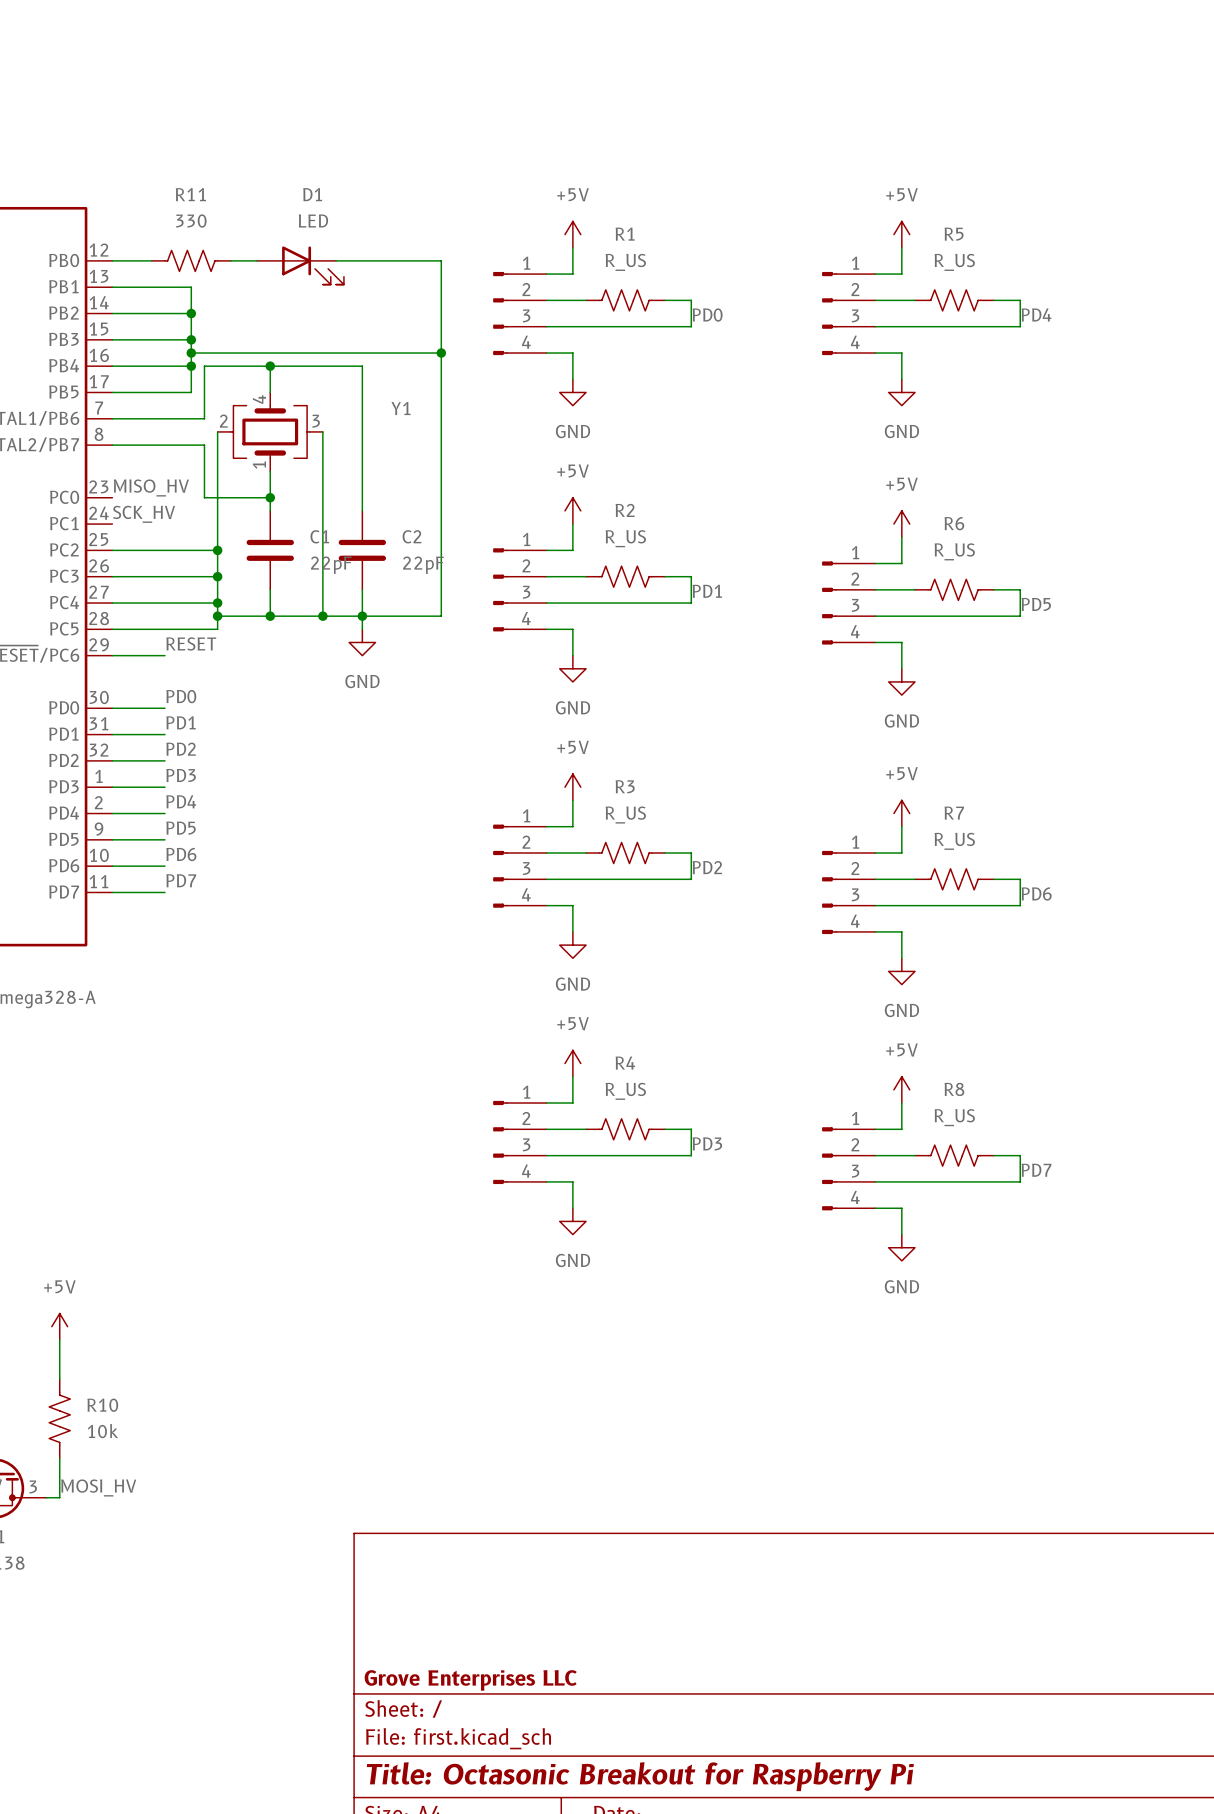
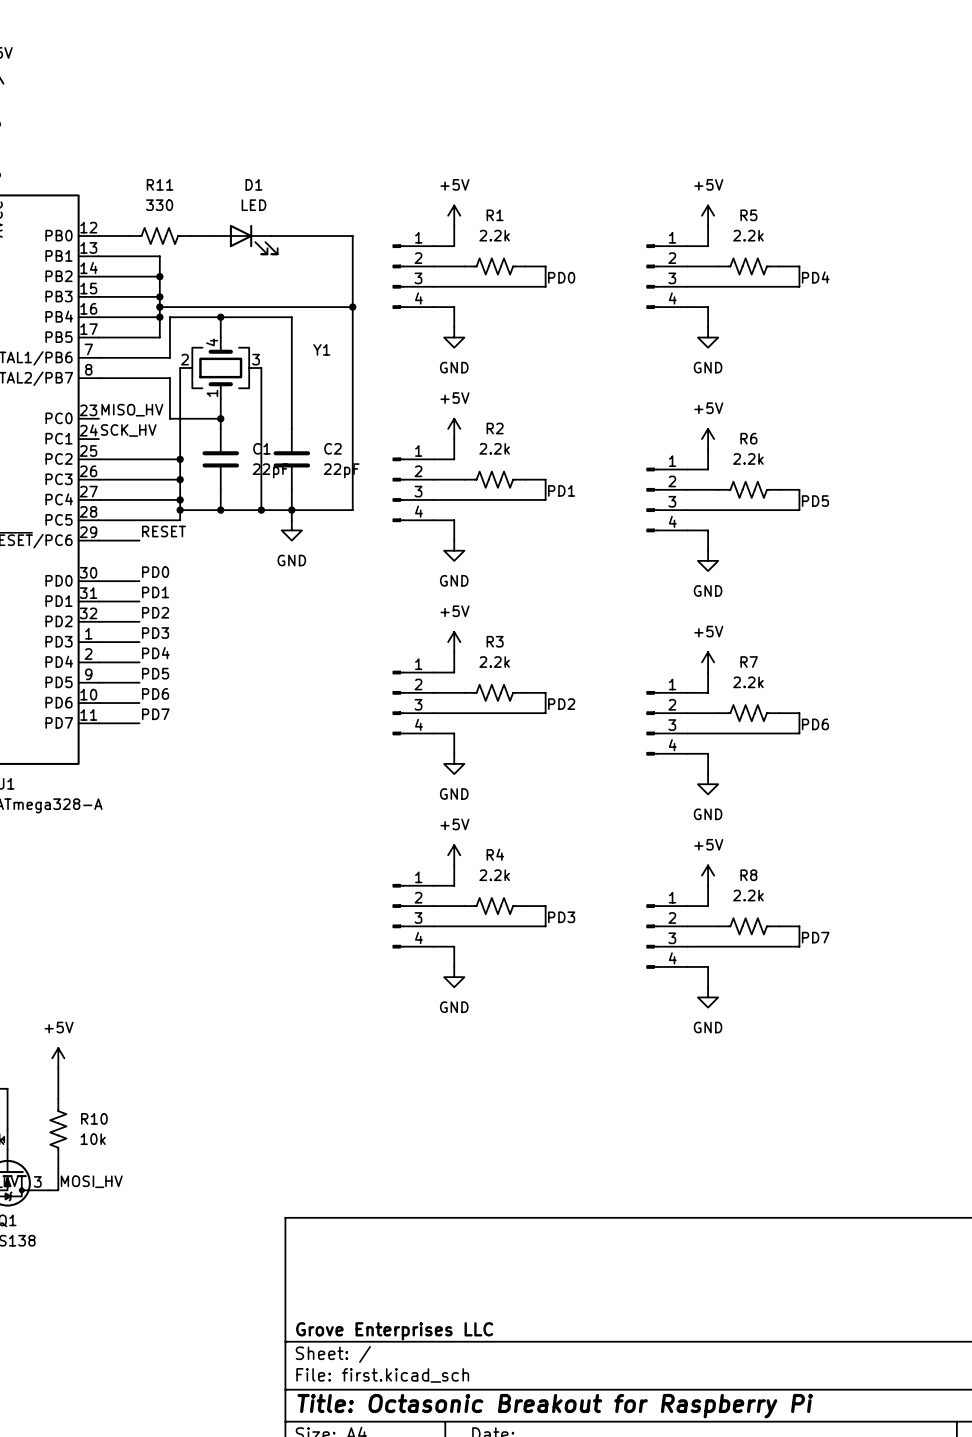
R1 value: R_US (625, 262) -> 2.2k (494, 235)
R5 value: R_US (954, 262) -> 2.2k (748, 235)
R2 value: R_US (625, 538) -> 2.2k (494, 448)
R6 value: R_US (954, 551) -> 2.2k (748, 458)
R3 value: R_US (625, 815) -> 2.2k (494, 662)
R7 value: R_US (954, 841) -> 2.2k (748, 682)
R4 value: R_US (625, 1091) -> 2.2k (494, 875)
R8 value: R_US (954, 1117) -> 2.2k (748, 895)

